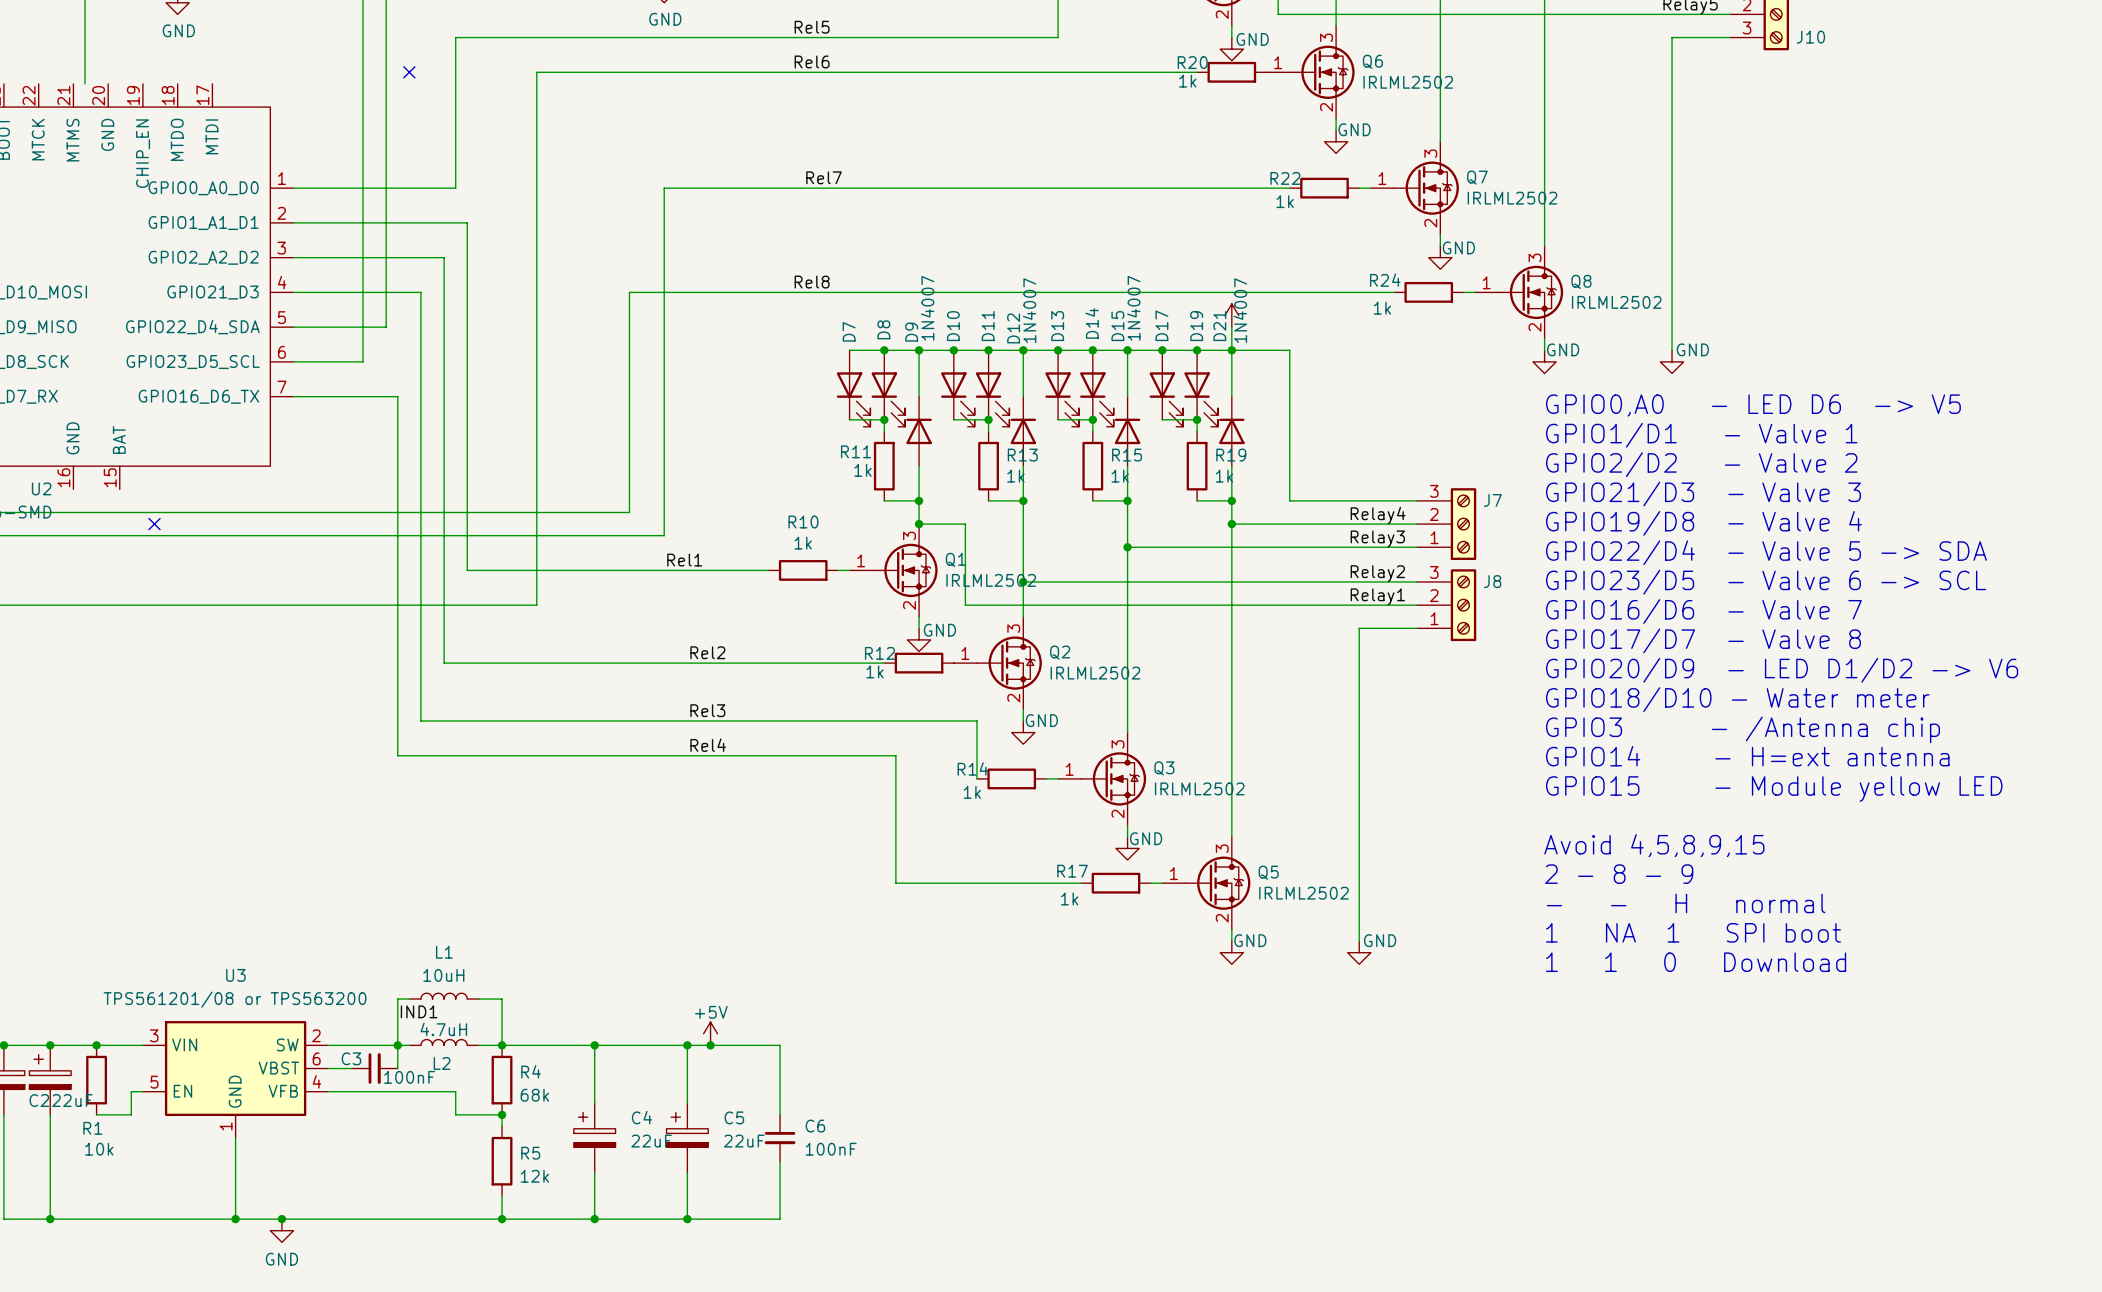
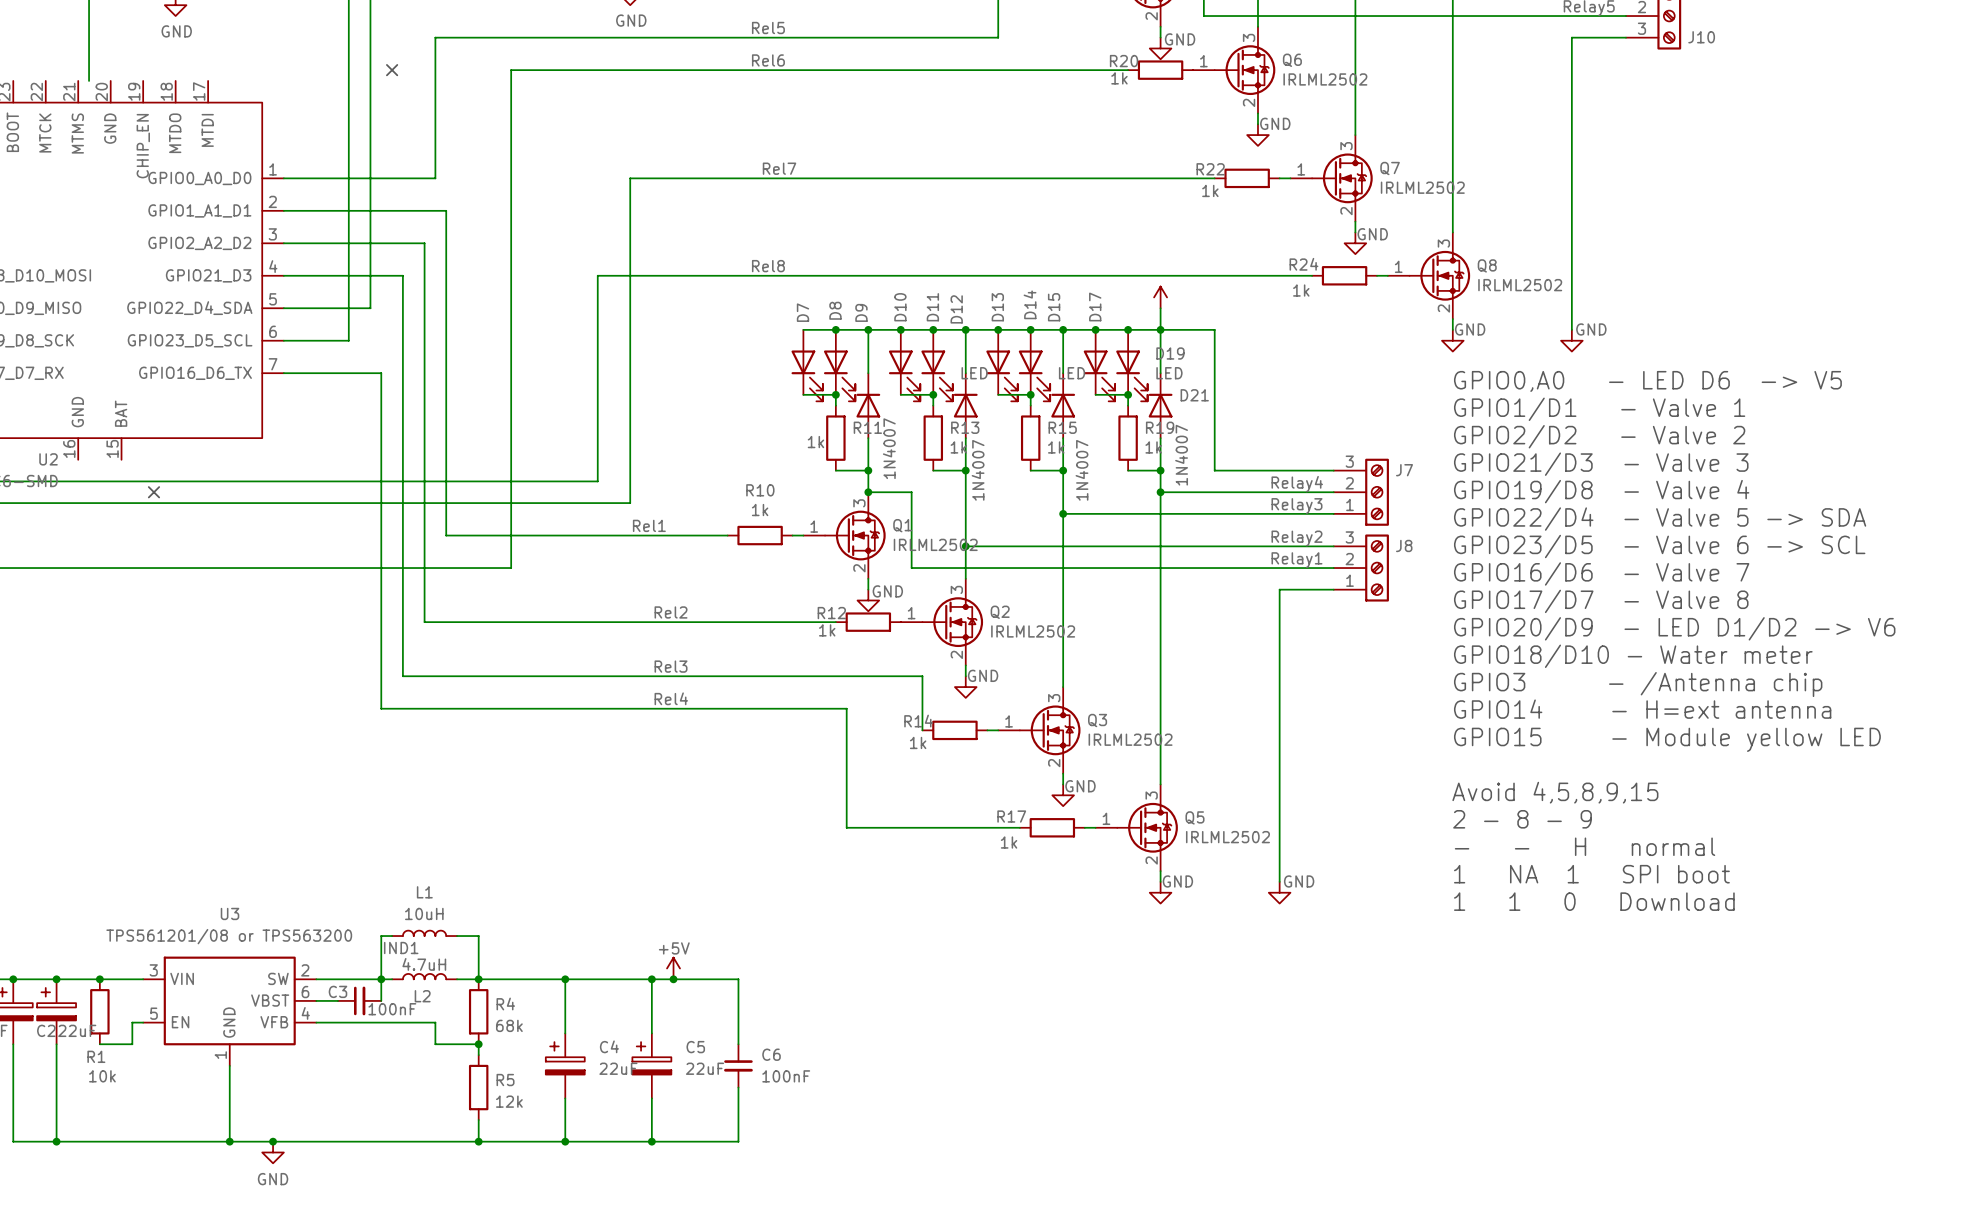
D9 value position: 1N4007 (927, 308) -> 1N4007 (889, 448)
D15 value position: 1N4007 (1133, 308) -> 1N4007 (1081, 470)
D12 value position: 1N4007 (1029, 310) -> 1N4007 (978, 470)
D21 value position: 1N4007 (1240, 310) -> 1N4007 (1181, 455)
D19 name rotation: 0° (1196, 326) -> 90° clockwise (1170, 353)
D19 name position: D19 (1196, 326) -> D19 (1170, 353)
D21 name rotation: 0° (1219, 326) -> 90° clockwise (1194, 395)
D21 name position: D21 (1219, 326) -> D21 (1194, 395)
D11 value: none -> LED (974, 373)
D14 value: none -> LED (1072, 373)
D19 value: none -> LED (1169, 373)
R11 name position: R11 (855, 451) -> R11 (867, 427)

